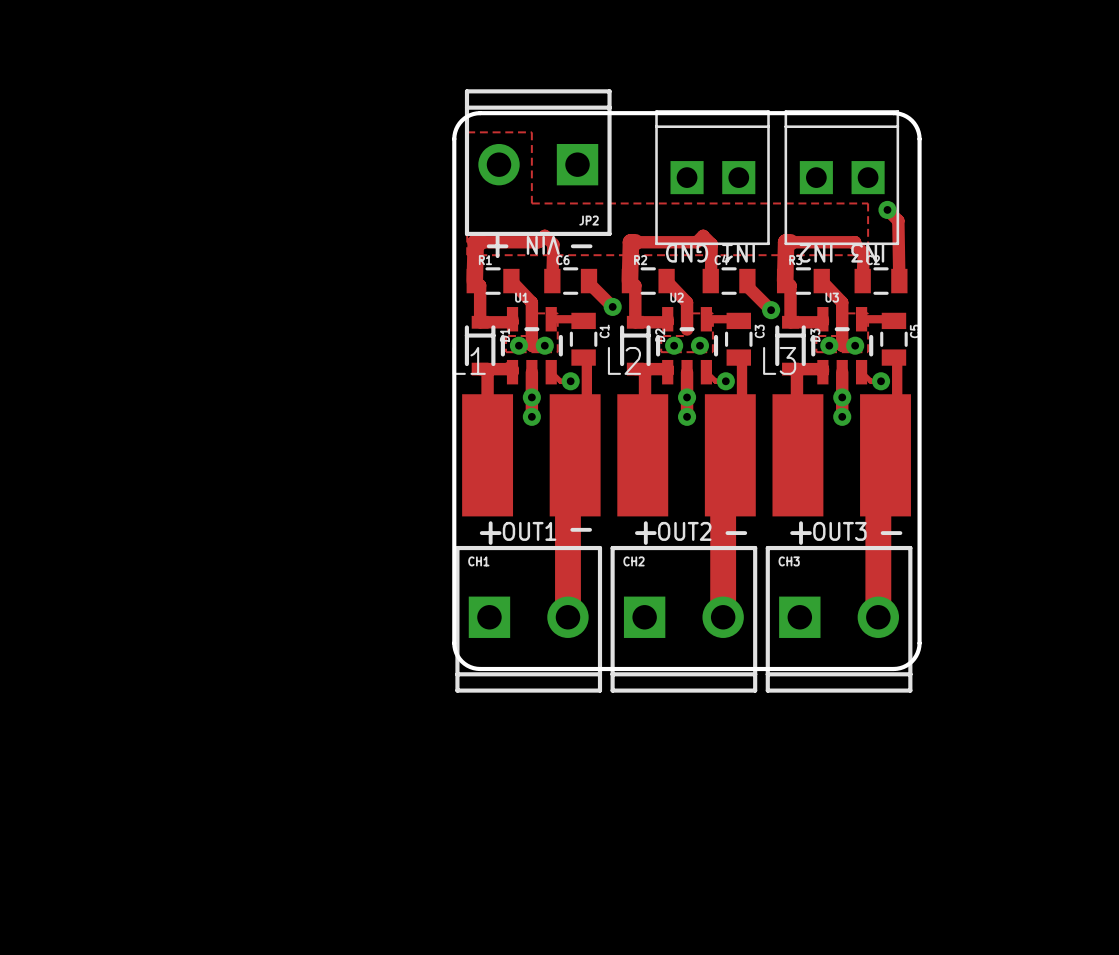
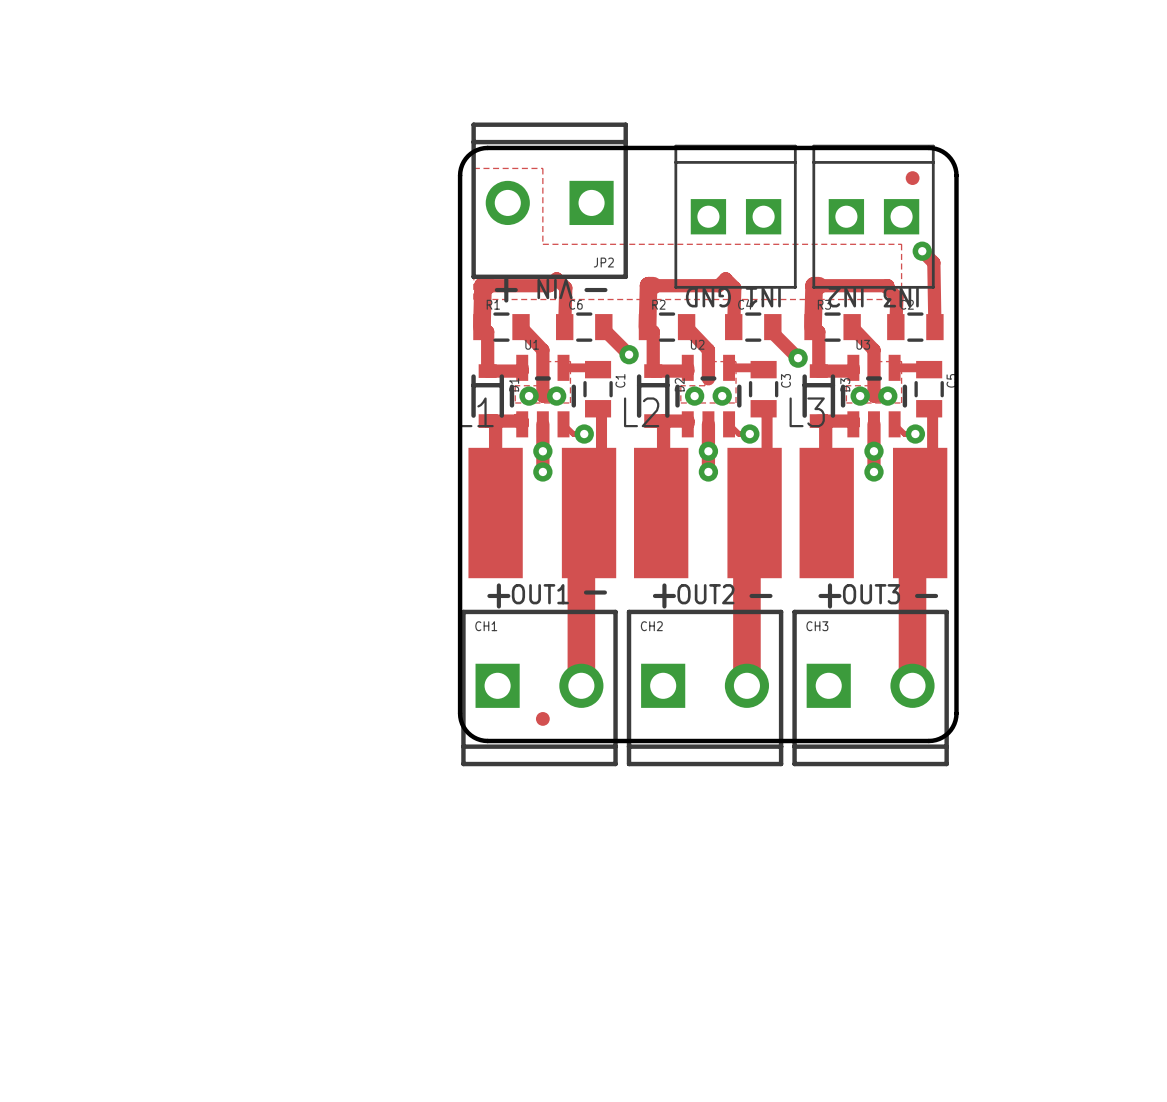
part: none -> (912, 178)
part: none -> (542, 718)

